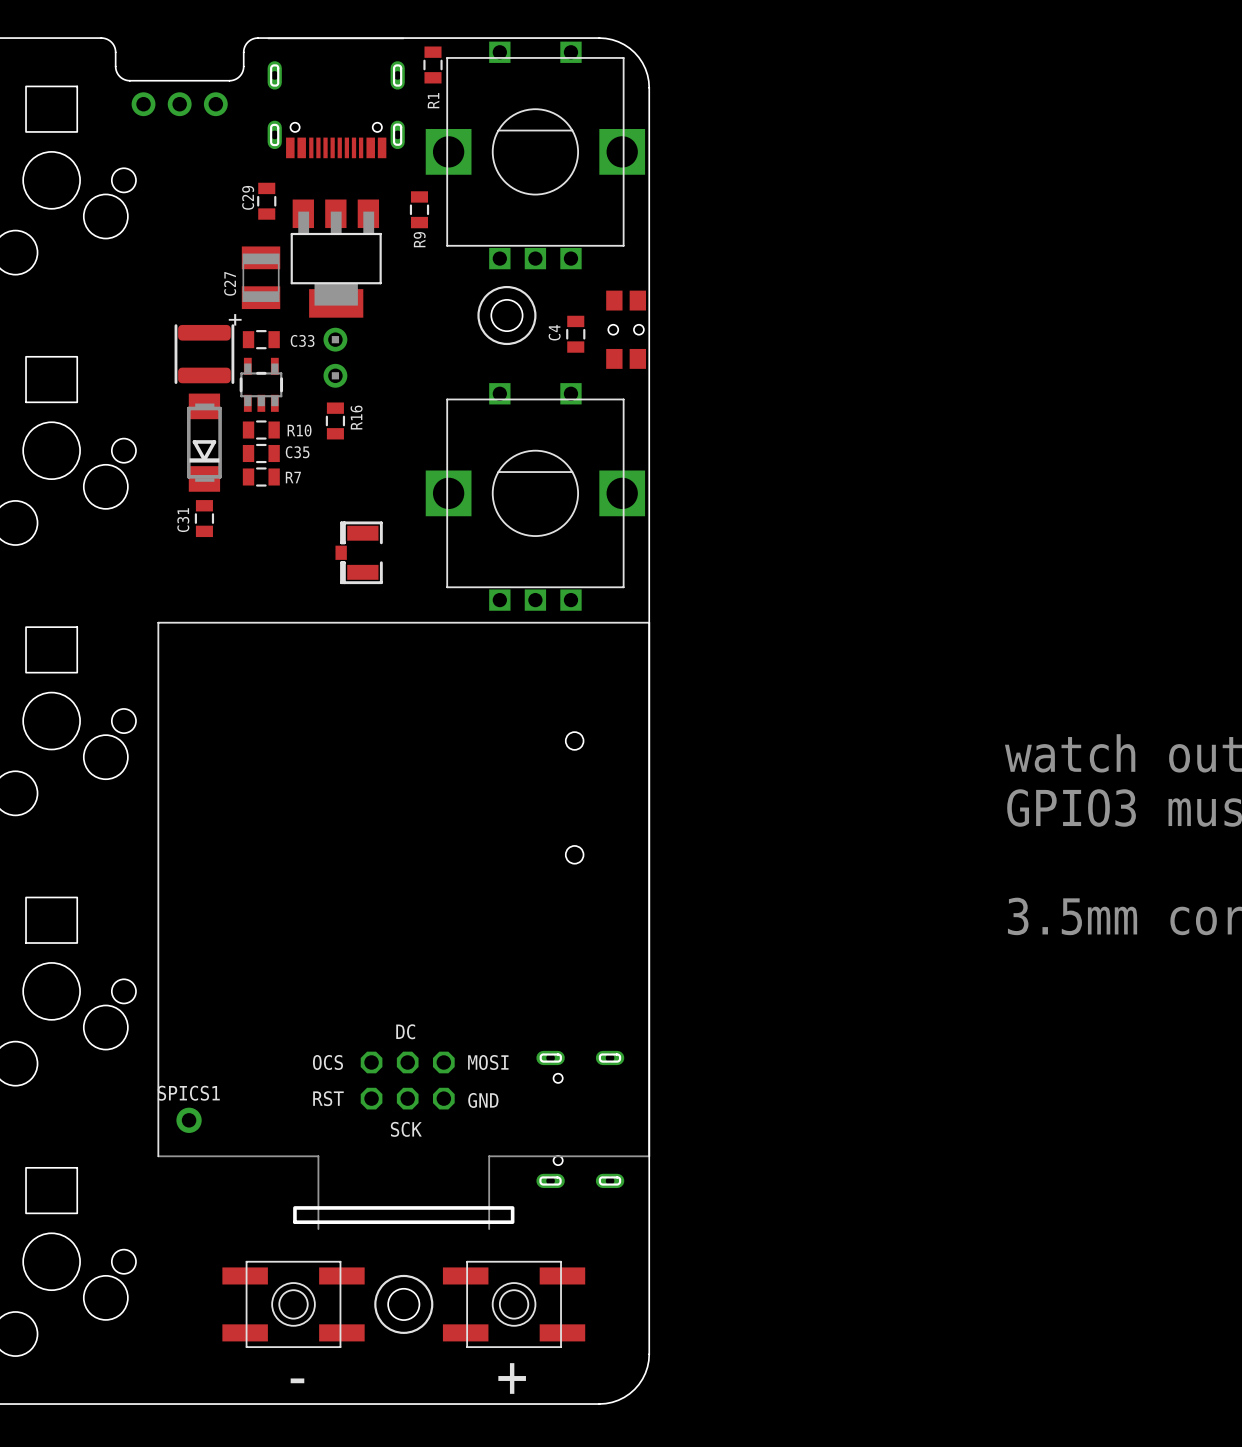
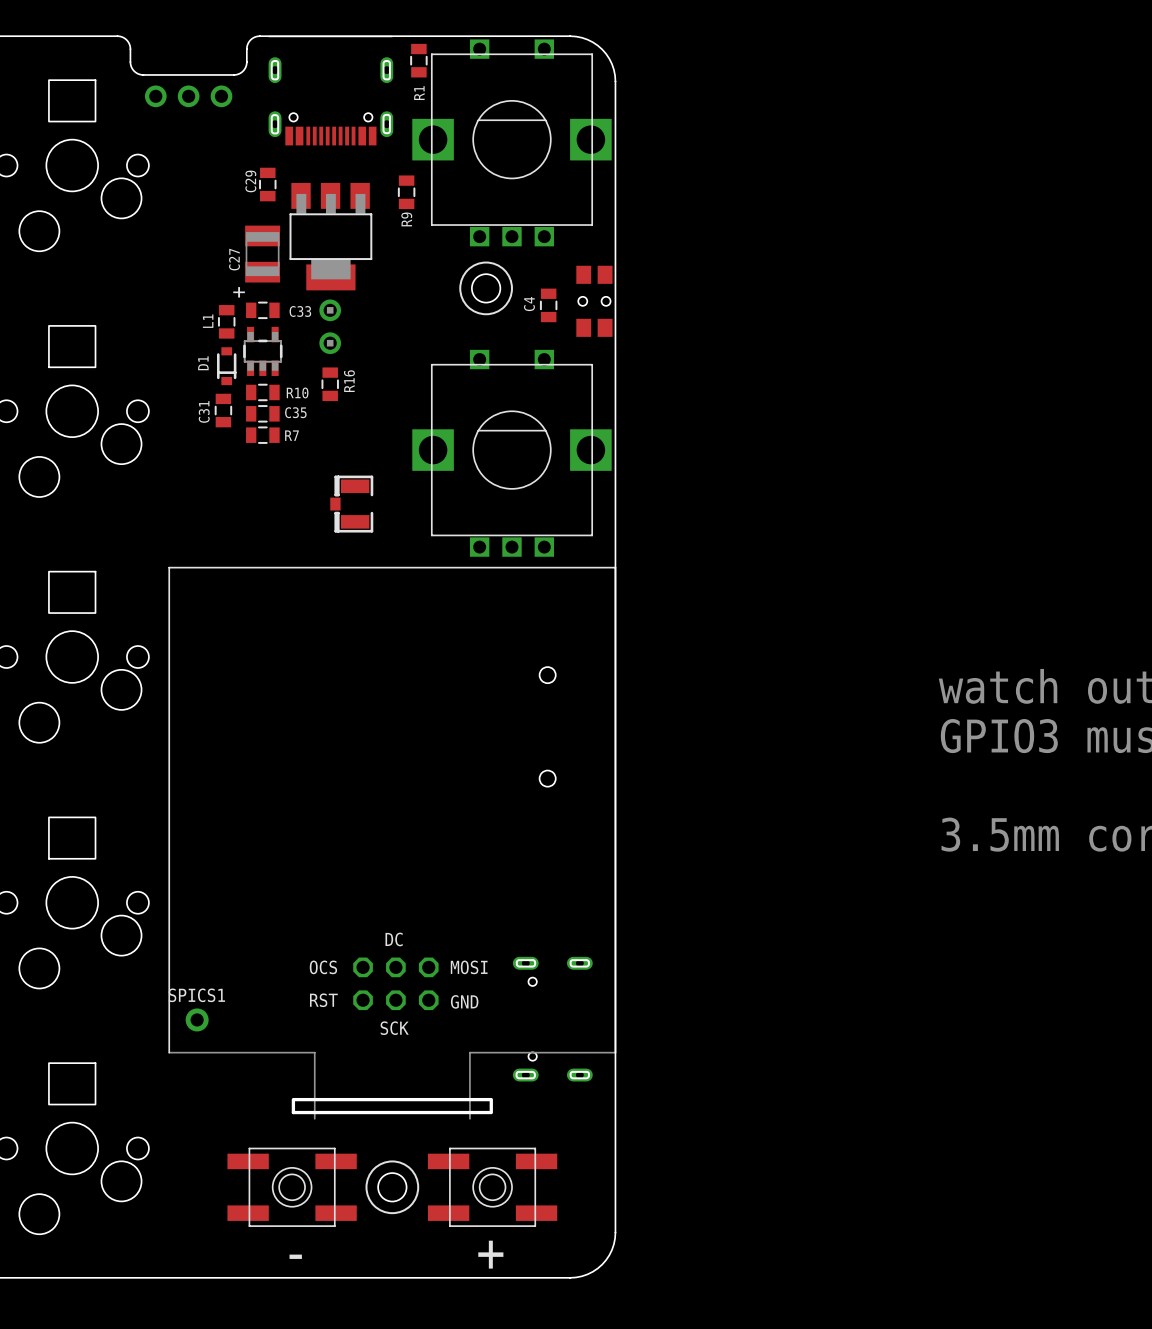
L1: none -> (226, 321)
part: (204, 354) -> none
D1: none -> (226, 366)
part: (204, 442) -> none
C31 position: (204, 518) -> (223, 410)

